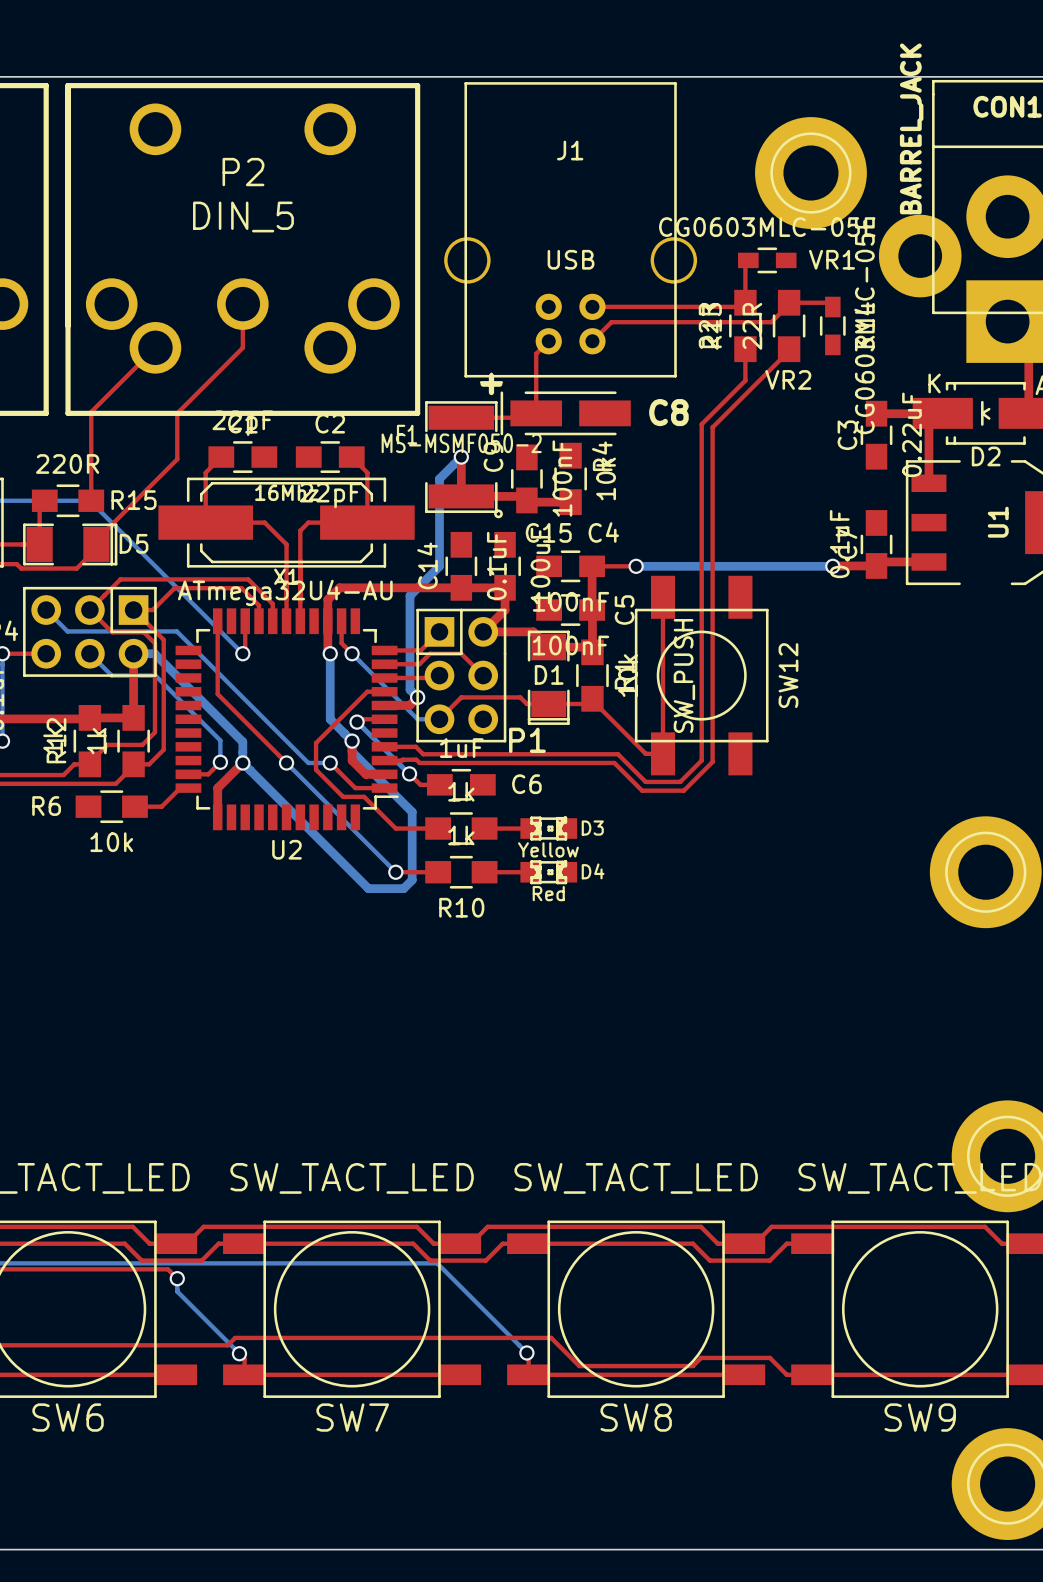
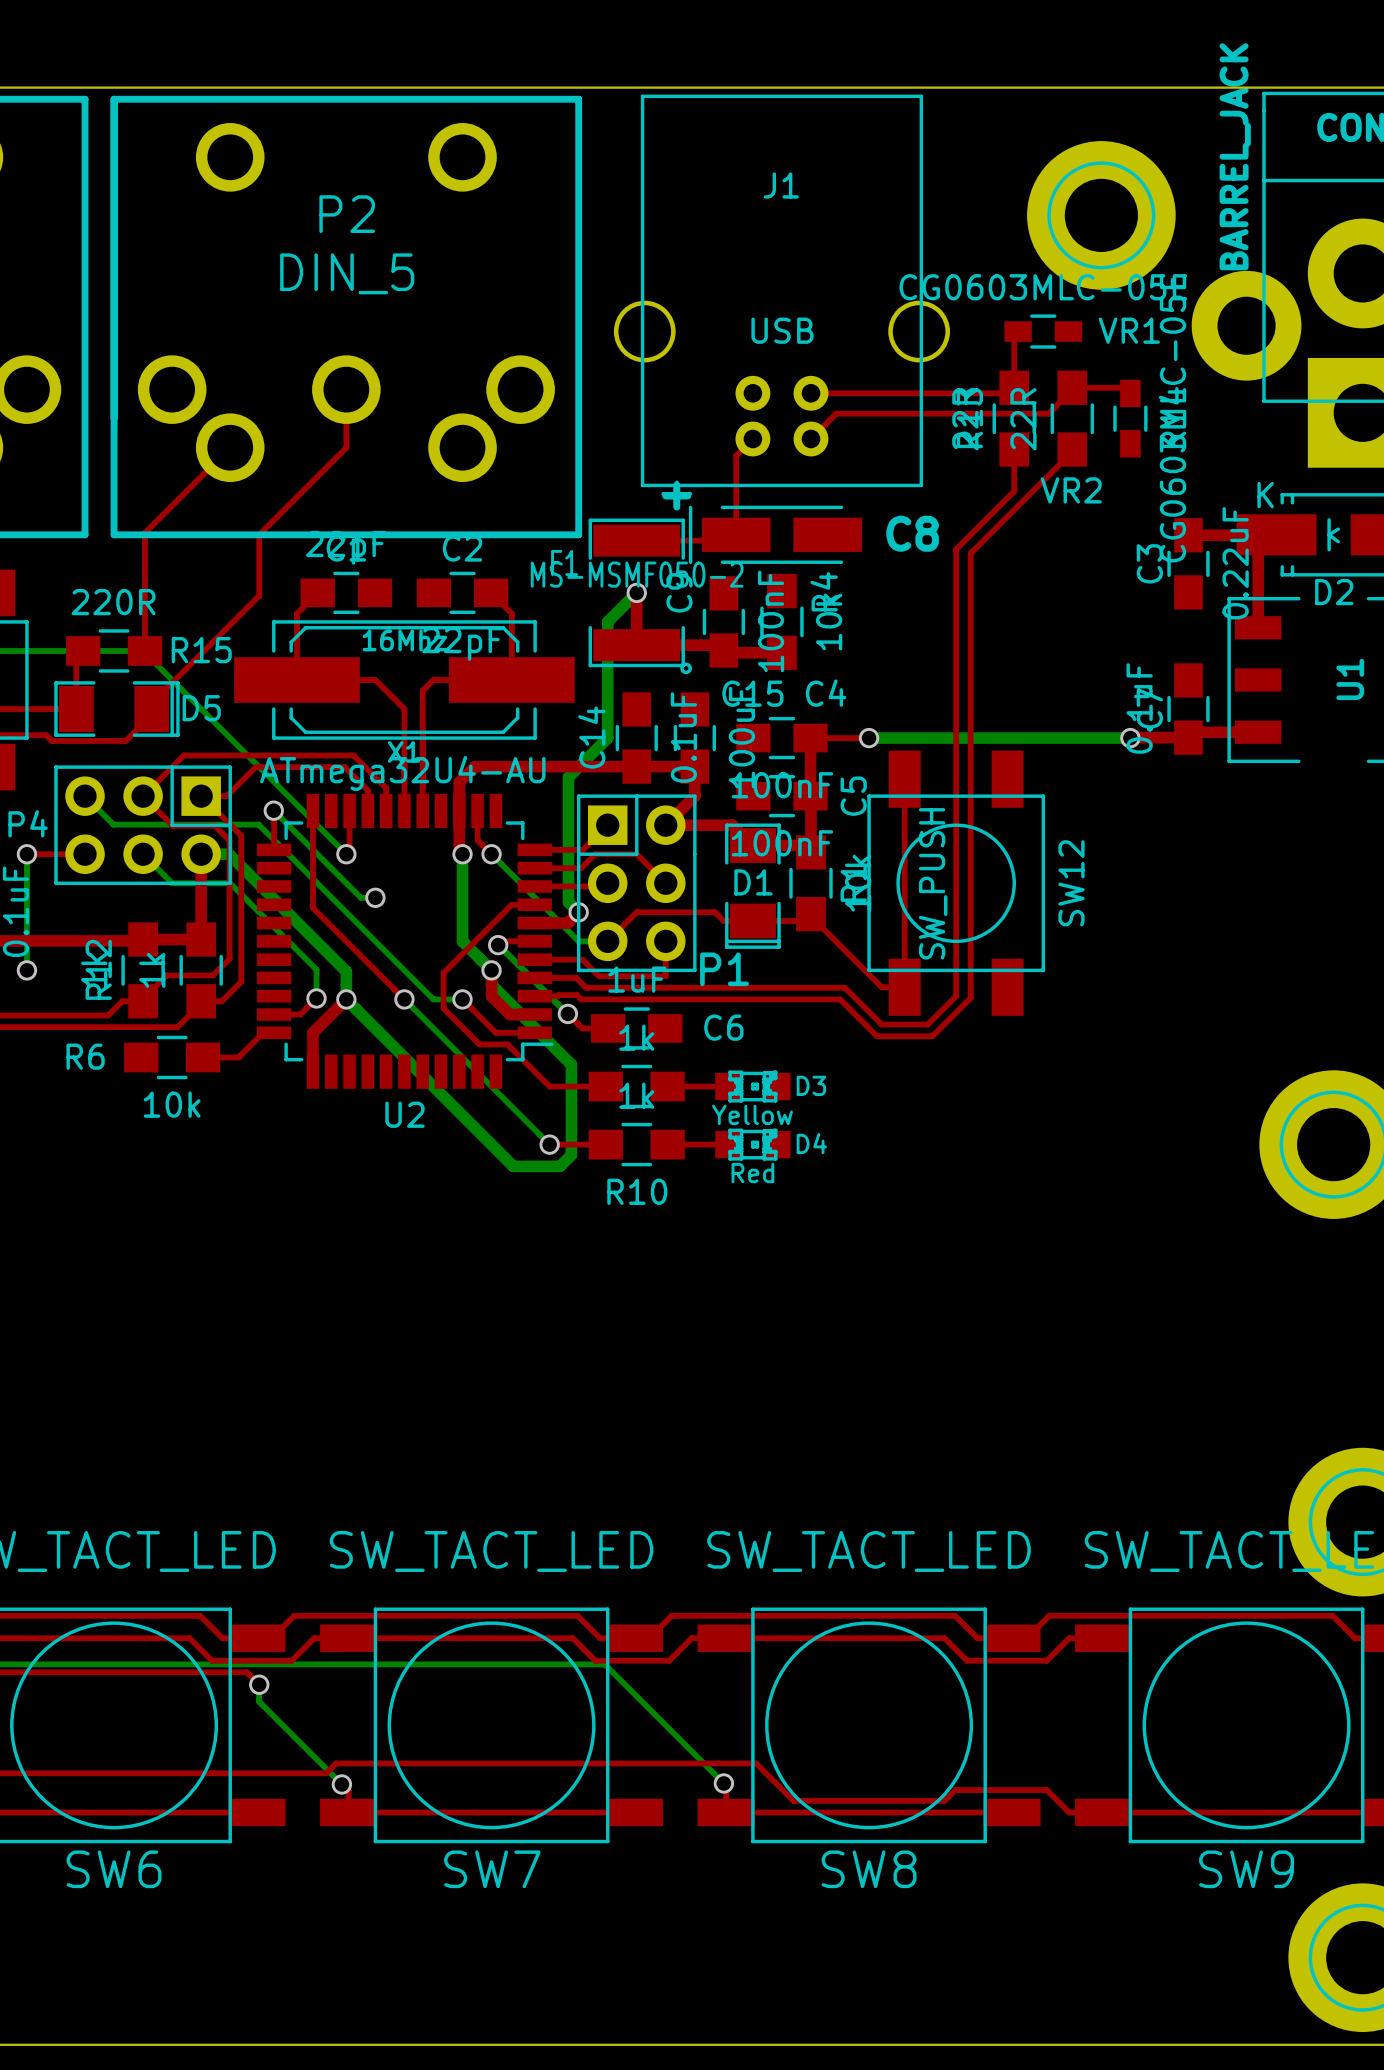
top track: none -> (273, 810) (274, 849)
bottom track: none -> (273, 810) (360, 897) (375, 897)
via: none -> (273, 810)
via: none -> (375, 897)
top track: none -> (665, 941) (665, 976) (599, 976) (582, 959) (534, 959)

